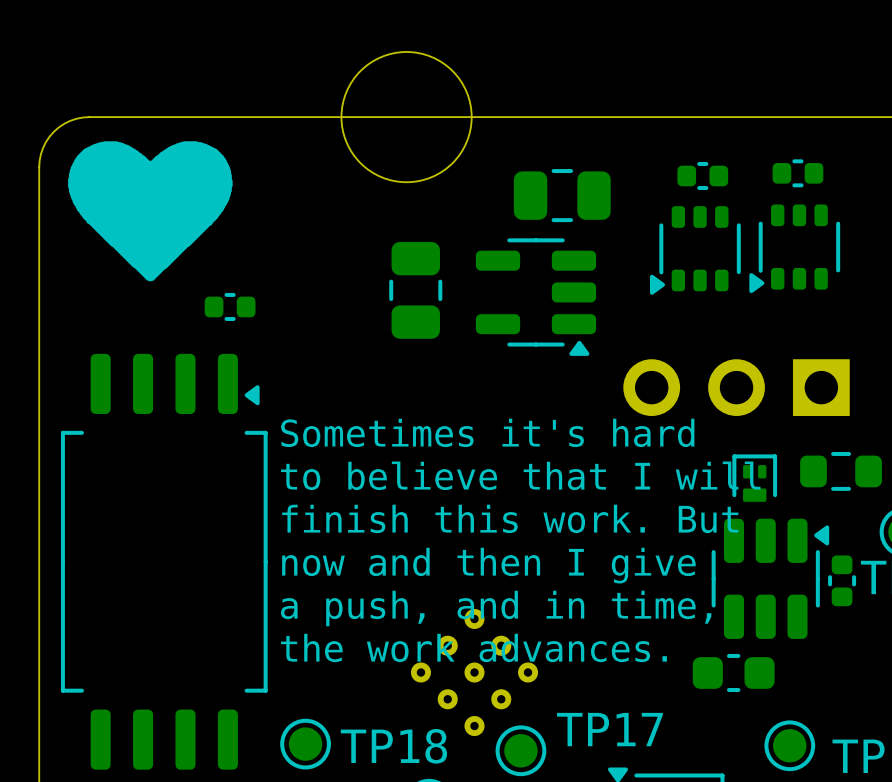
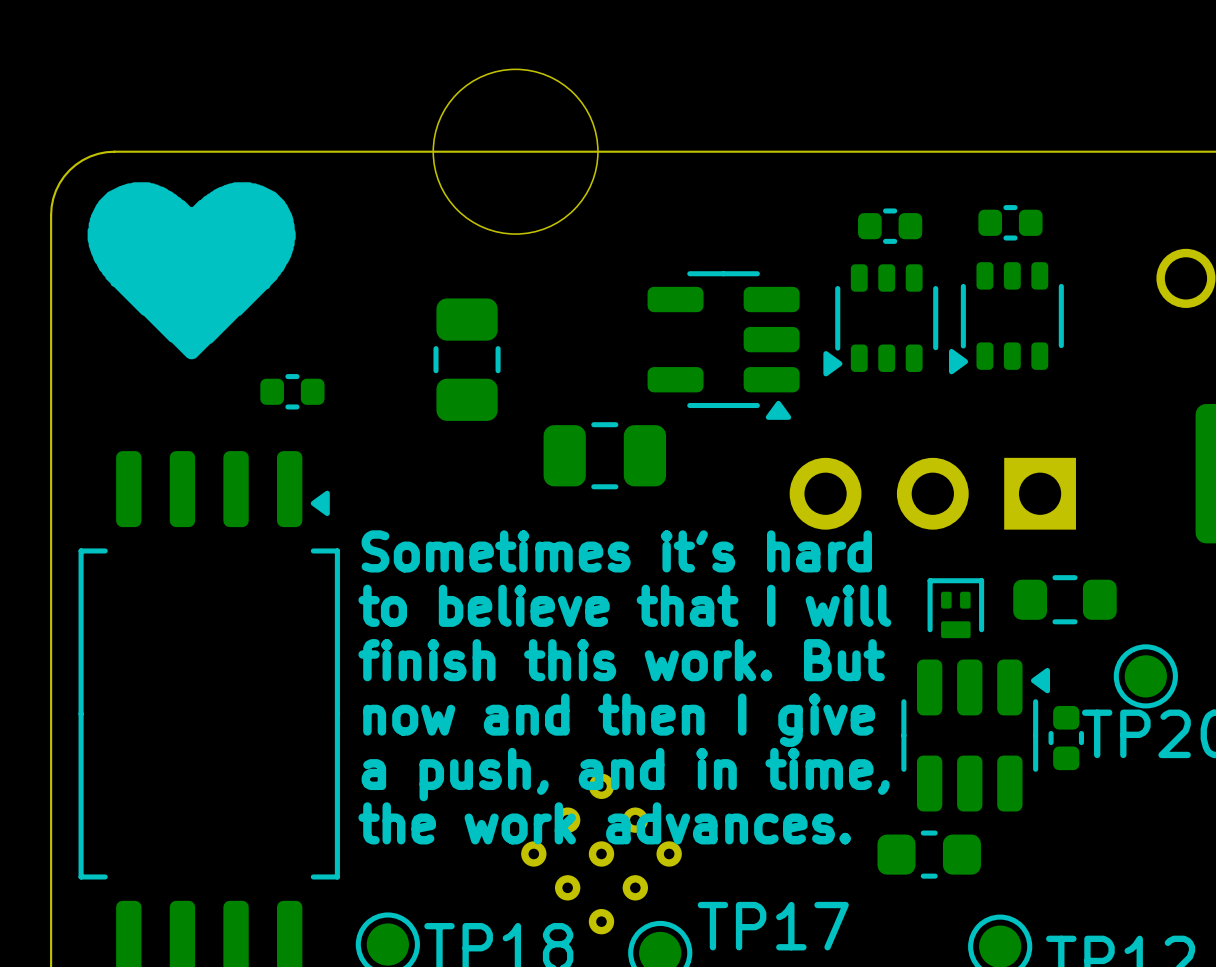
part: (562, 195) -> none
part: none -> (467, 359)
part: (415, 290) -> none
part position: (535, 297) -> (723, 345)
part: none -> (604, 455)

